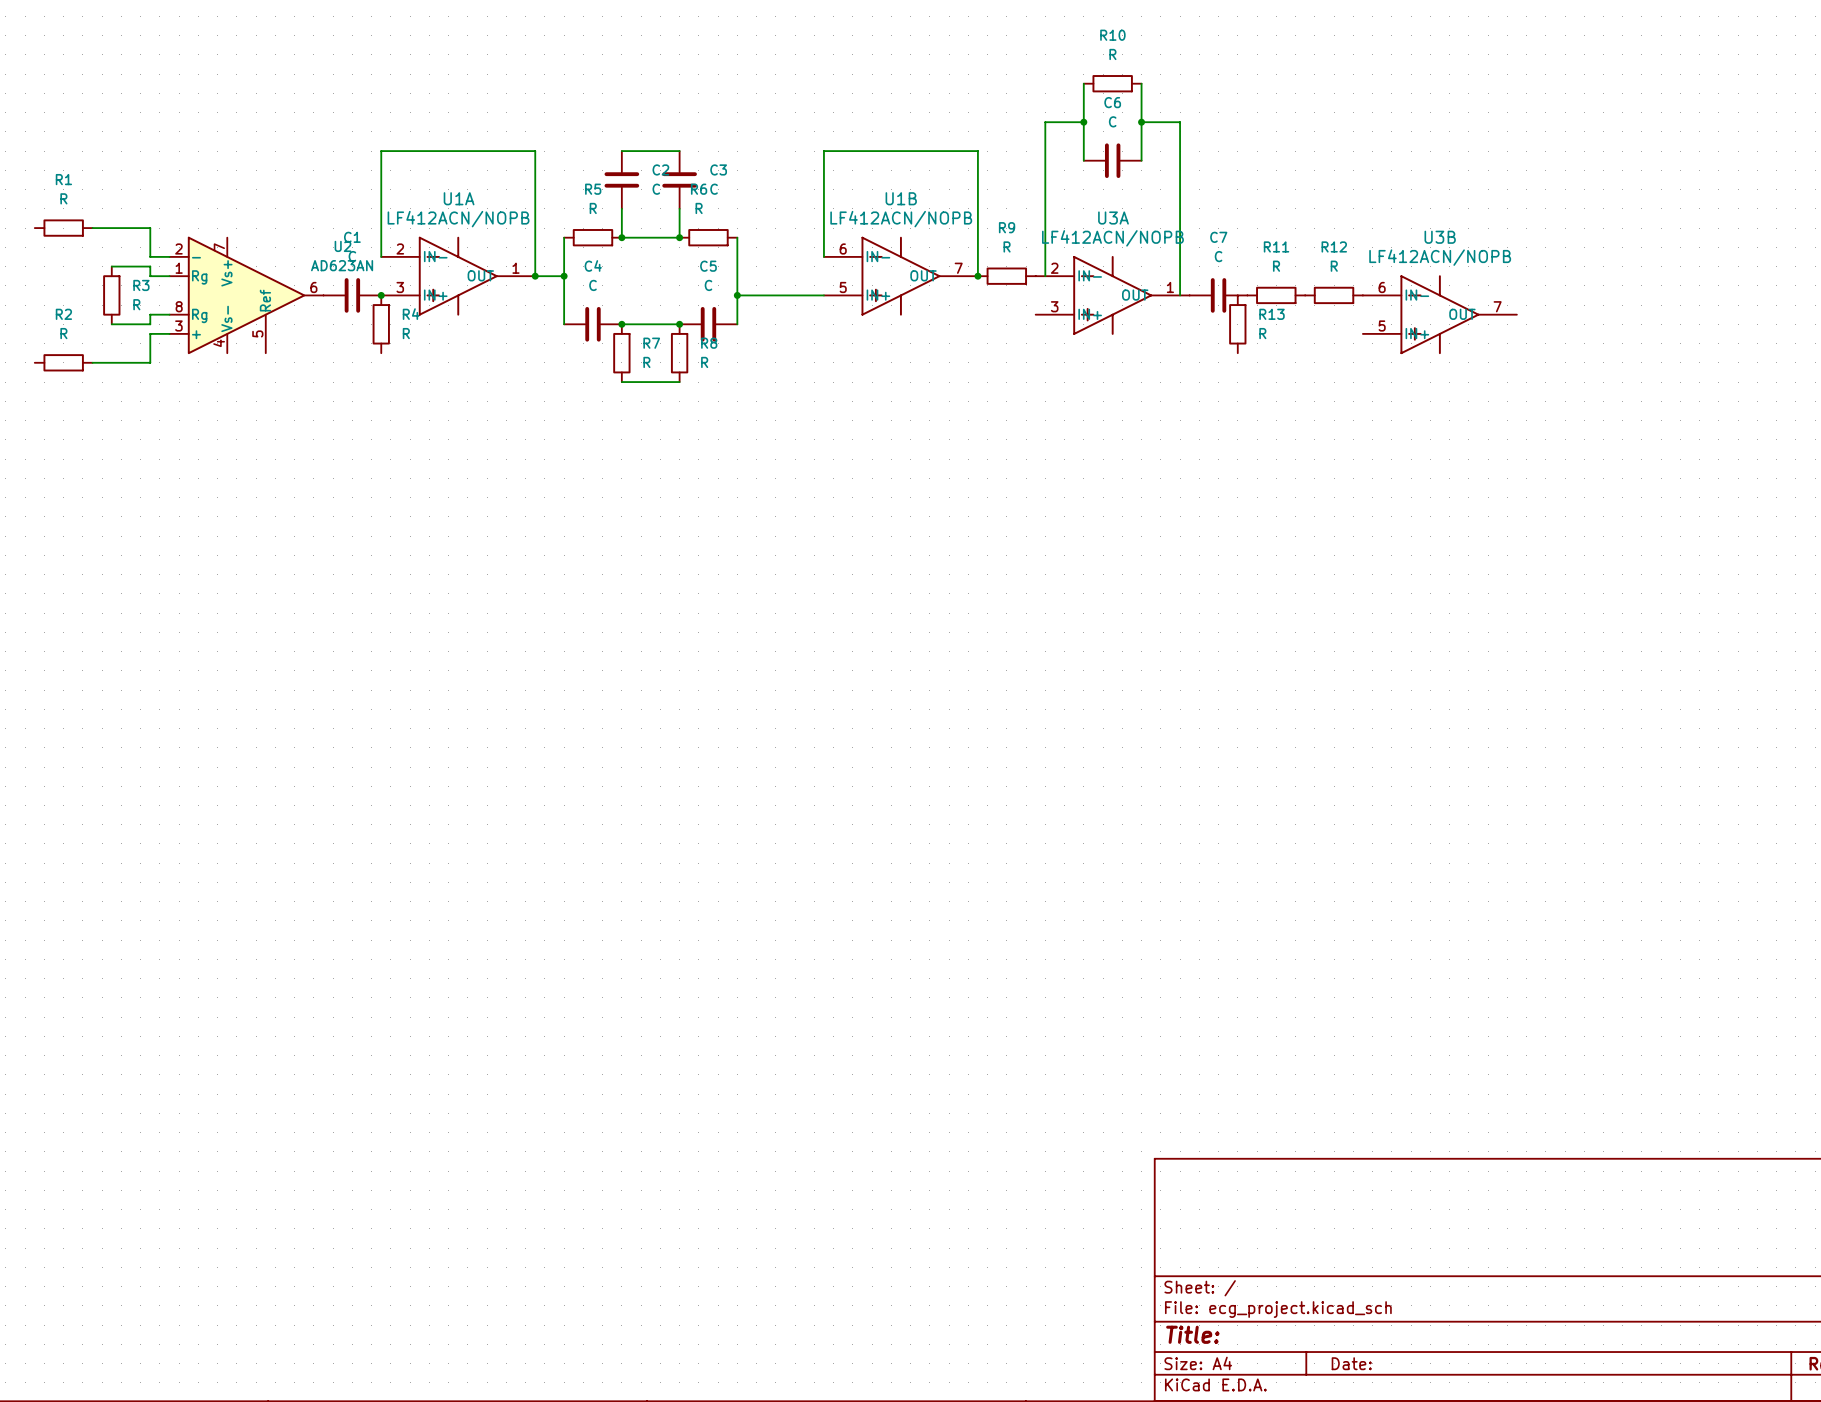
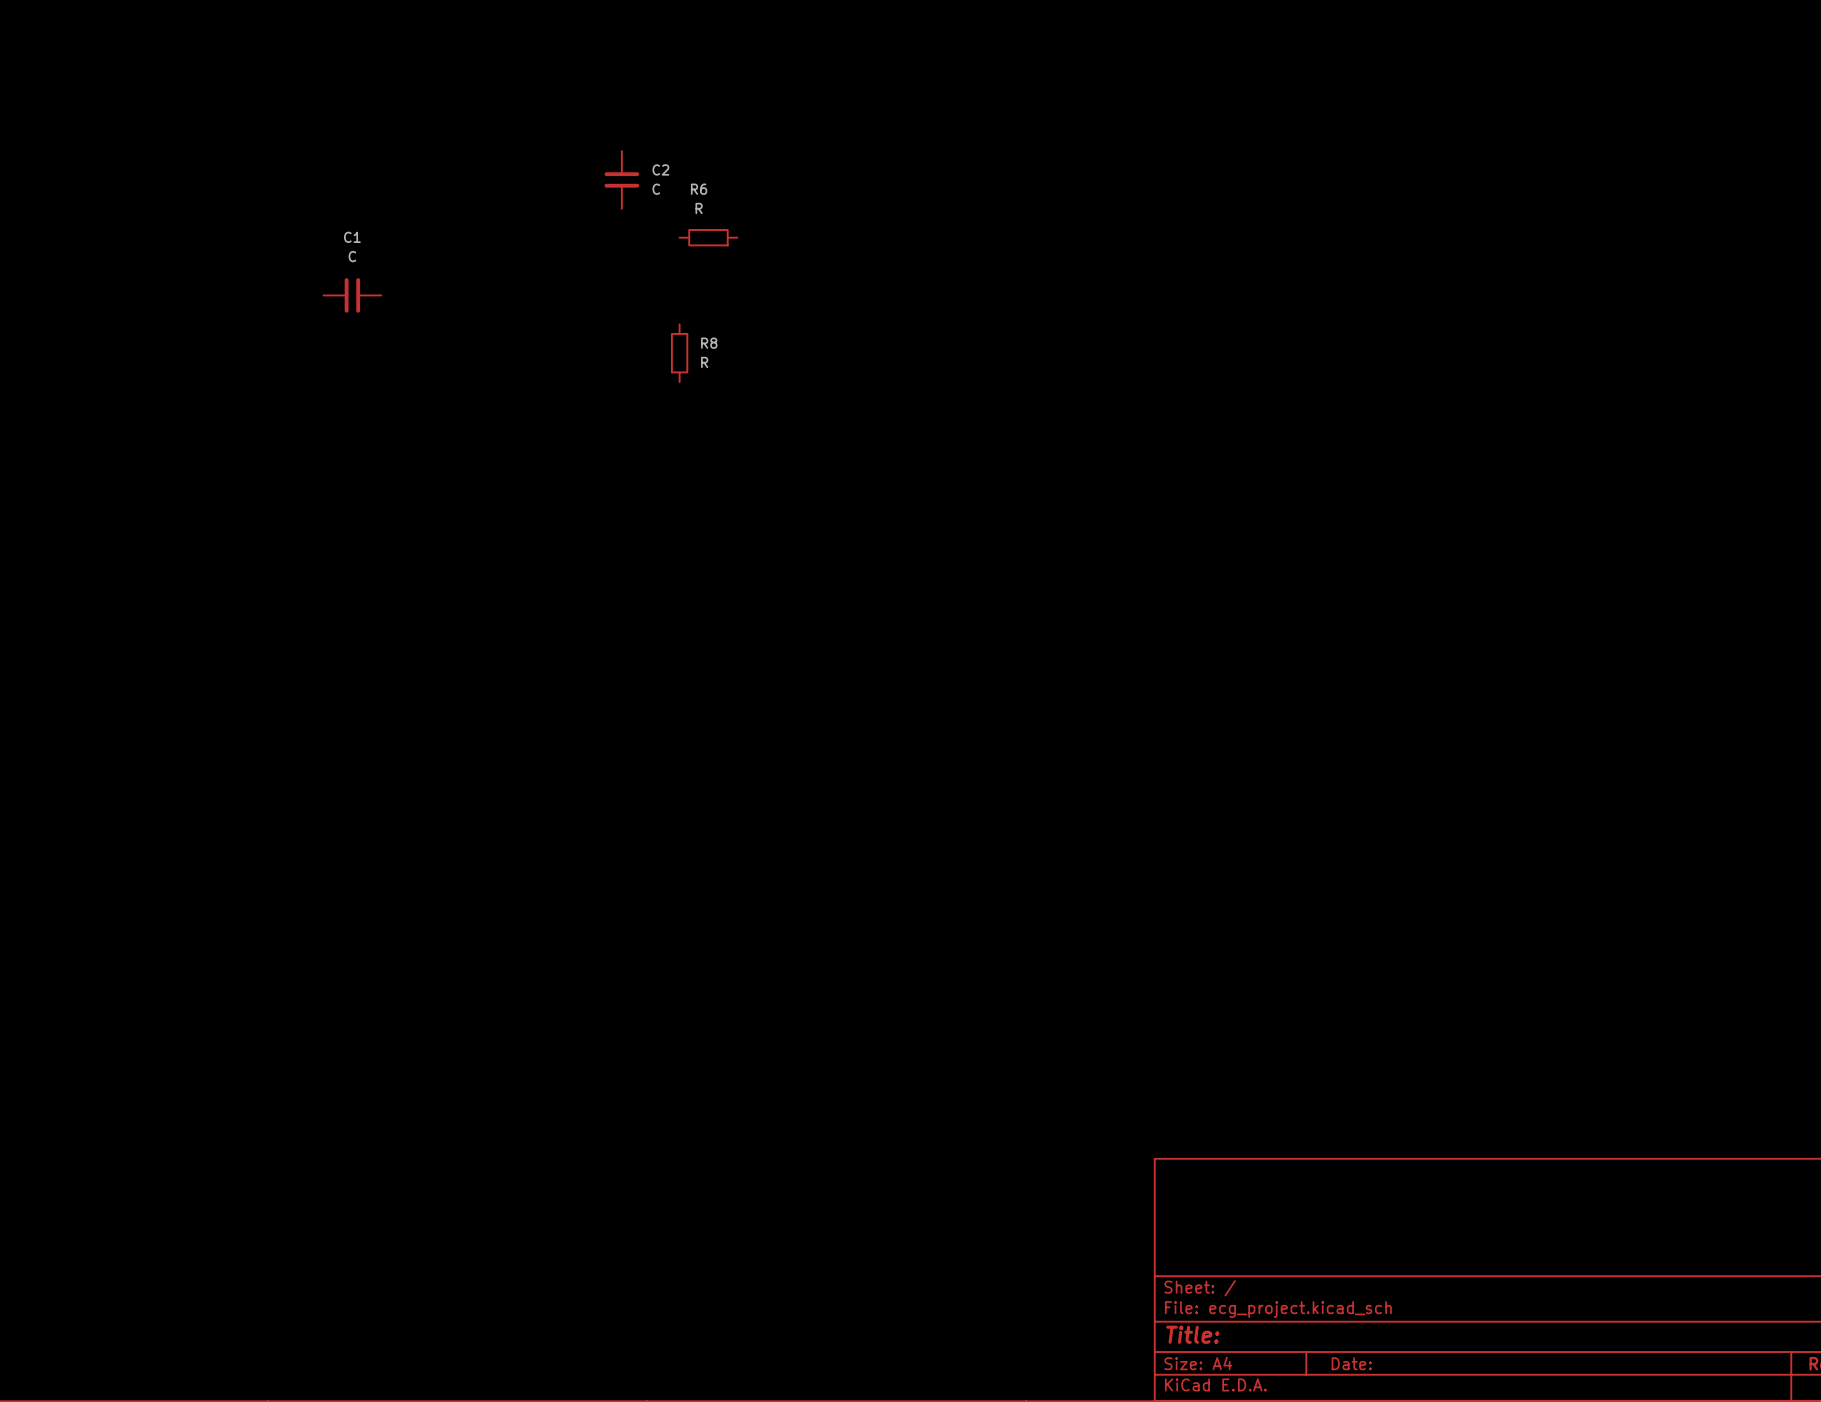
wire: (1083, 83) (1083, 160) -> none
R10: R (1112, 83) -> none
wire: (1141, 83) (1141, 160) -> none
wire: (1083, 122) (1045, 122) (1045, 276) -> none
junction: (1083, 122) -> none
wire: (1141, 122) (1180, 122) (1180, 295) -> none
junction: (1141, 122) -> none
wire: (621, 151) (679, 151) -> none
C6: C (1112, 160) -> none
C3: C (679, 179) -> none
wire: (621, 208) (621, 237) (679, 237) (679, 208) -> none
R1: R (63, 228) -> none
wire: (92, 228) (150, 228) (150, 256) (169, 256) -> none
wire: (564, 237) (564, 324) -> none
R5: R (592, 237) -> none
junction: (621, 237) -> none
junction: (679, 237) -> none
wire: (737, 237) (737, 324) -> none
wire: (381, 256) (381, 151) (535, 151) (535, 276) (564, 276) -> none
wire: (823, 256) (823, 151) (977, 151) (977, 276) -> none
wire: (111, 266) (150, 266) (150, 276) (169, 276) -> none
U1A: LF412ACN/NOPB (458, 276) -> none
junction: (535, 276) -> none
junction: (564, 276) -> none
U1B: LF412ACN/NOPB (900, 276) -> none
junction: (977, 276) -> none
R9: R (1006, 276) -> none
R3: R (111, 295) -> none
U2: AD623AN (246, 295) -> none
junction: (381, 295) -> none
wire: (737, 295) (823, 295) -> none
junction: (737, 295) -> none
U3A: LF412ACN/NOPB (1112, 295) -> none
C7: C (1218, 295) -> none
R11: R (1276, 295) -> none
R12: R (1334, 295) -> none
wire: (169, 314) (150, 314) (150, 324) (111, 324) -> none
U3B: LF412ACN/NOPB (1439, 314) -> none
R4: R (381, 324) -> none
C4: C (592, 324) -> none
wire: (621, 324) (679, 324) -> none
junction: (621, 324) -> none
junction: (679, 324) -> none
C5: C (708, 324) -> none
R13: R (1237, 324) -> none
wire: (169, 333) (150, 333) (150, 362) (92, 362) -> none
R7: R (621, 353) -> none
R2: R (63, 362) -> none
wire: (621, 382) (679, 382) -> none

